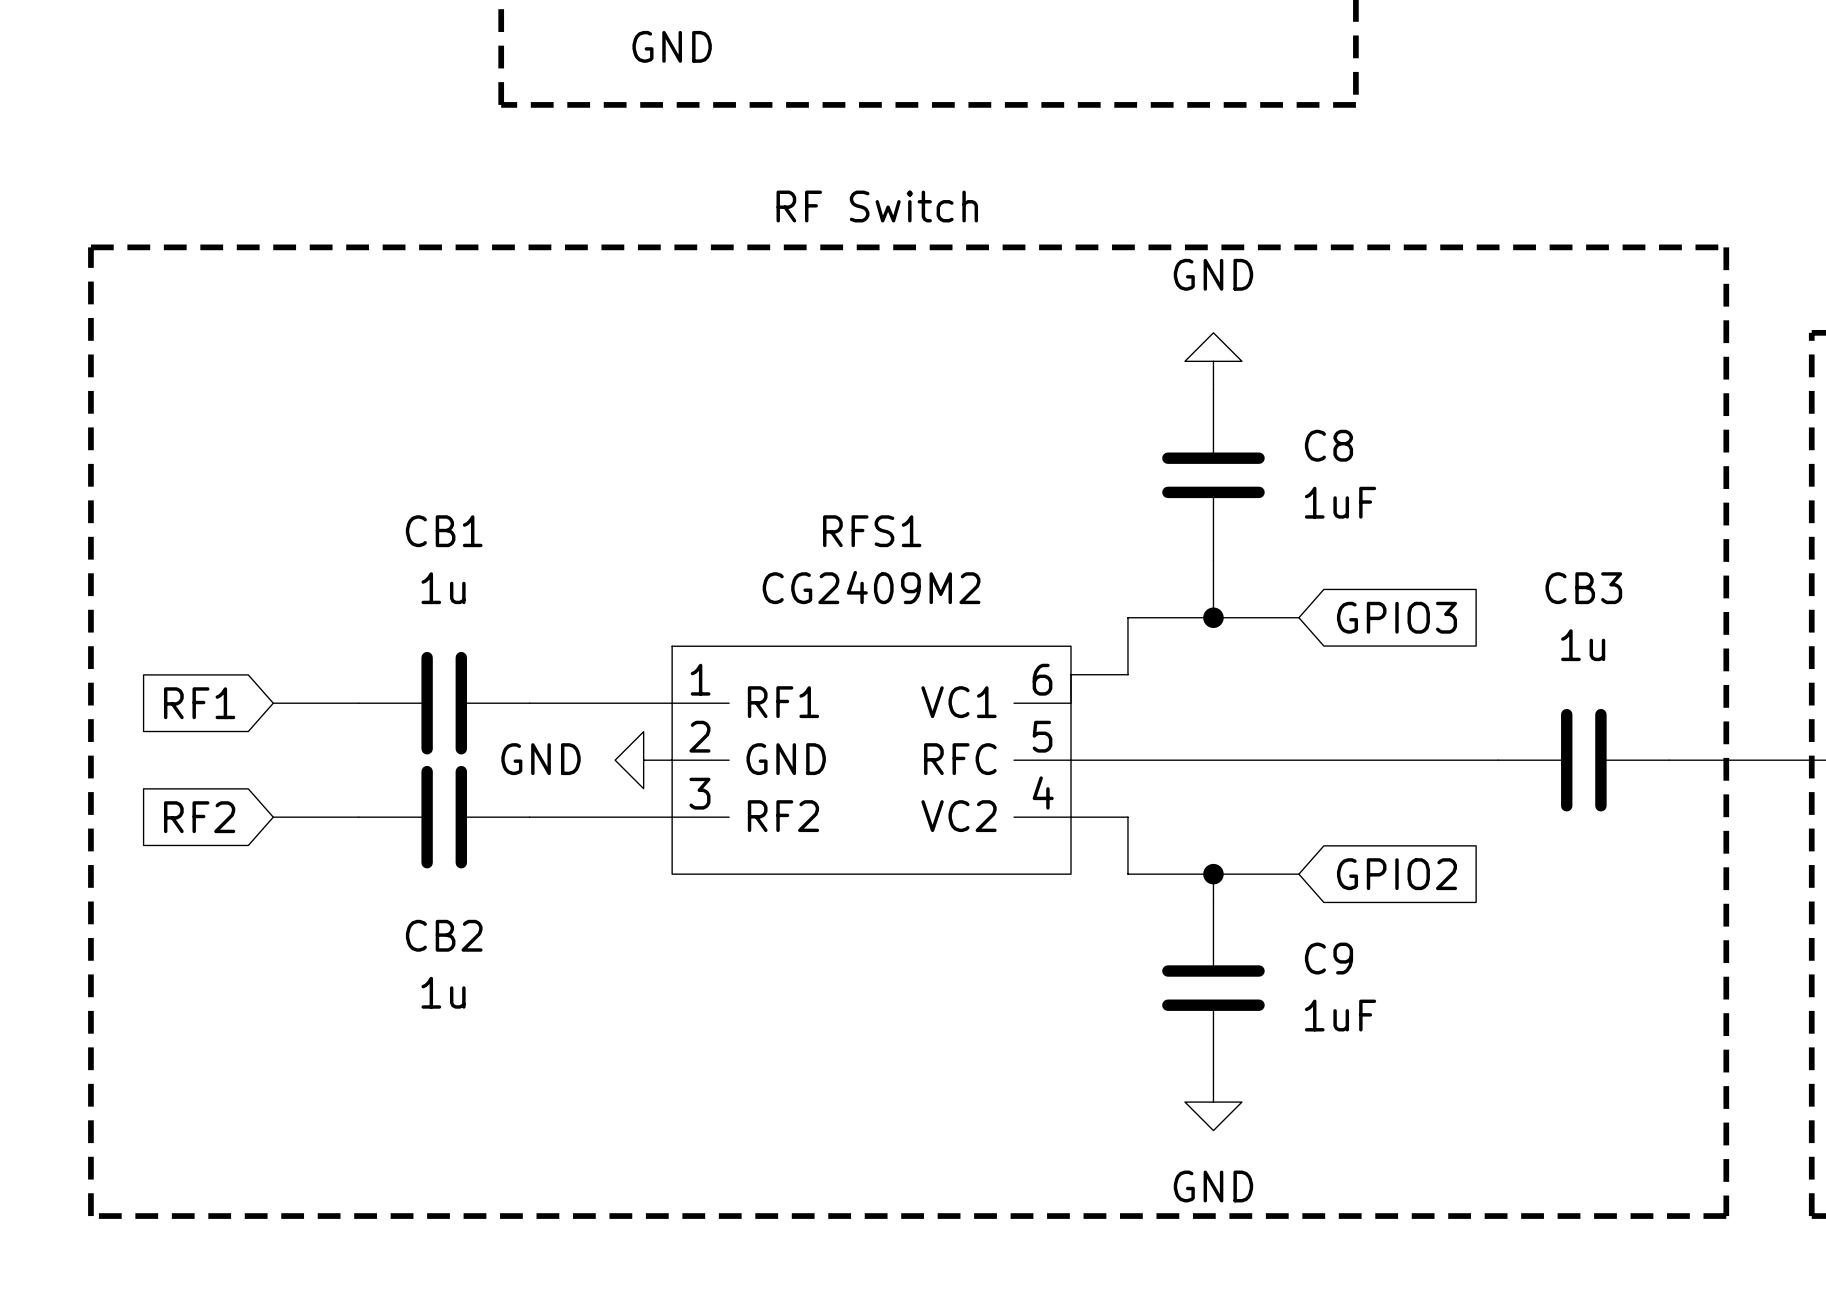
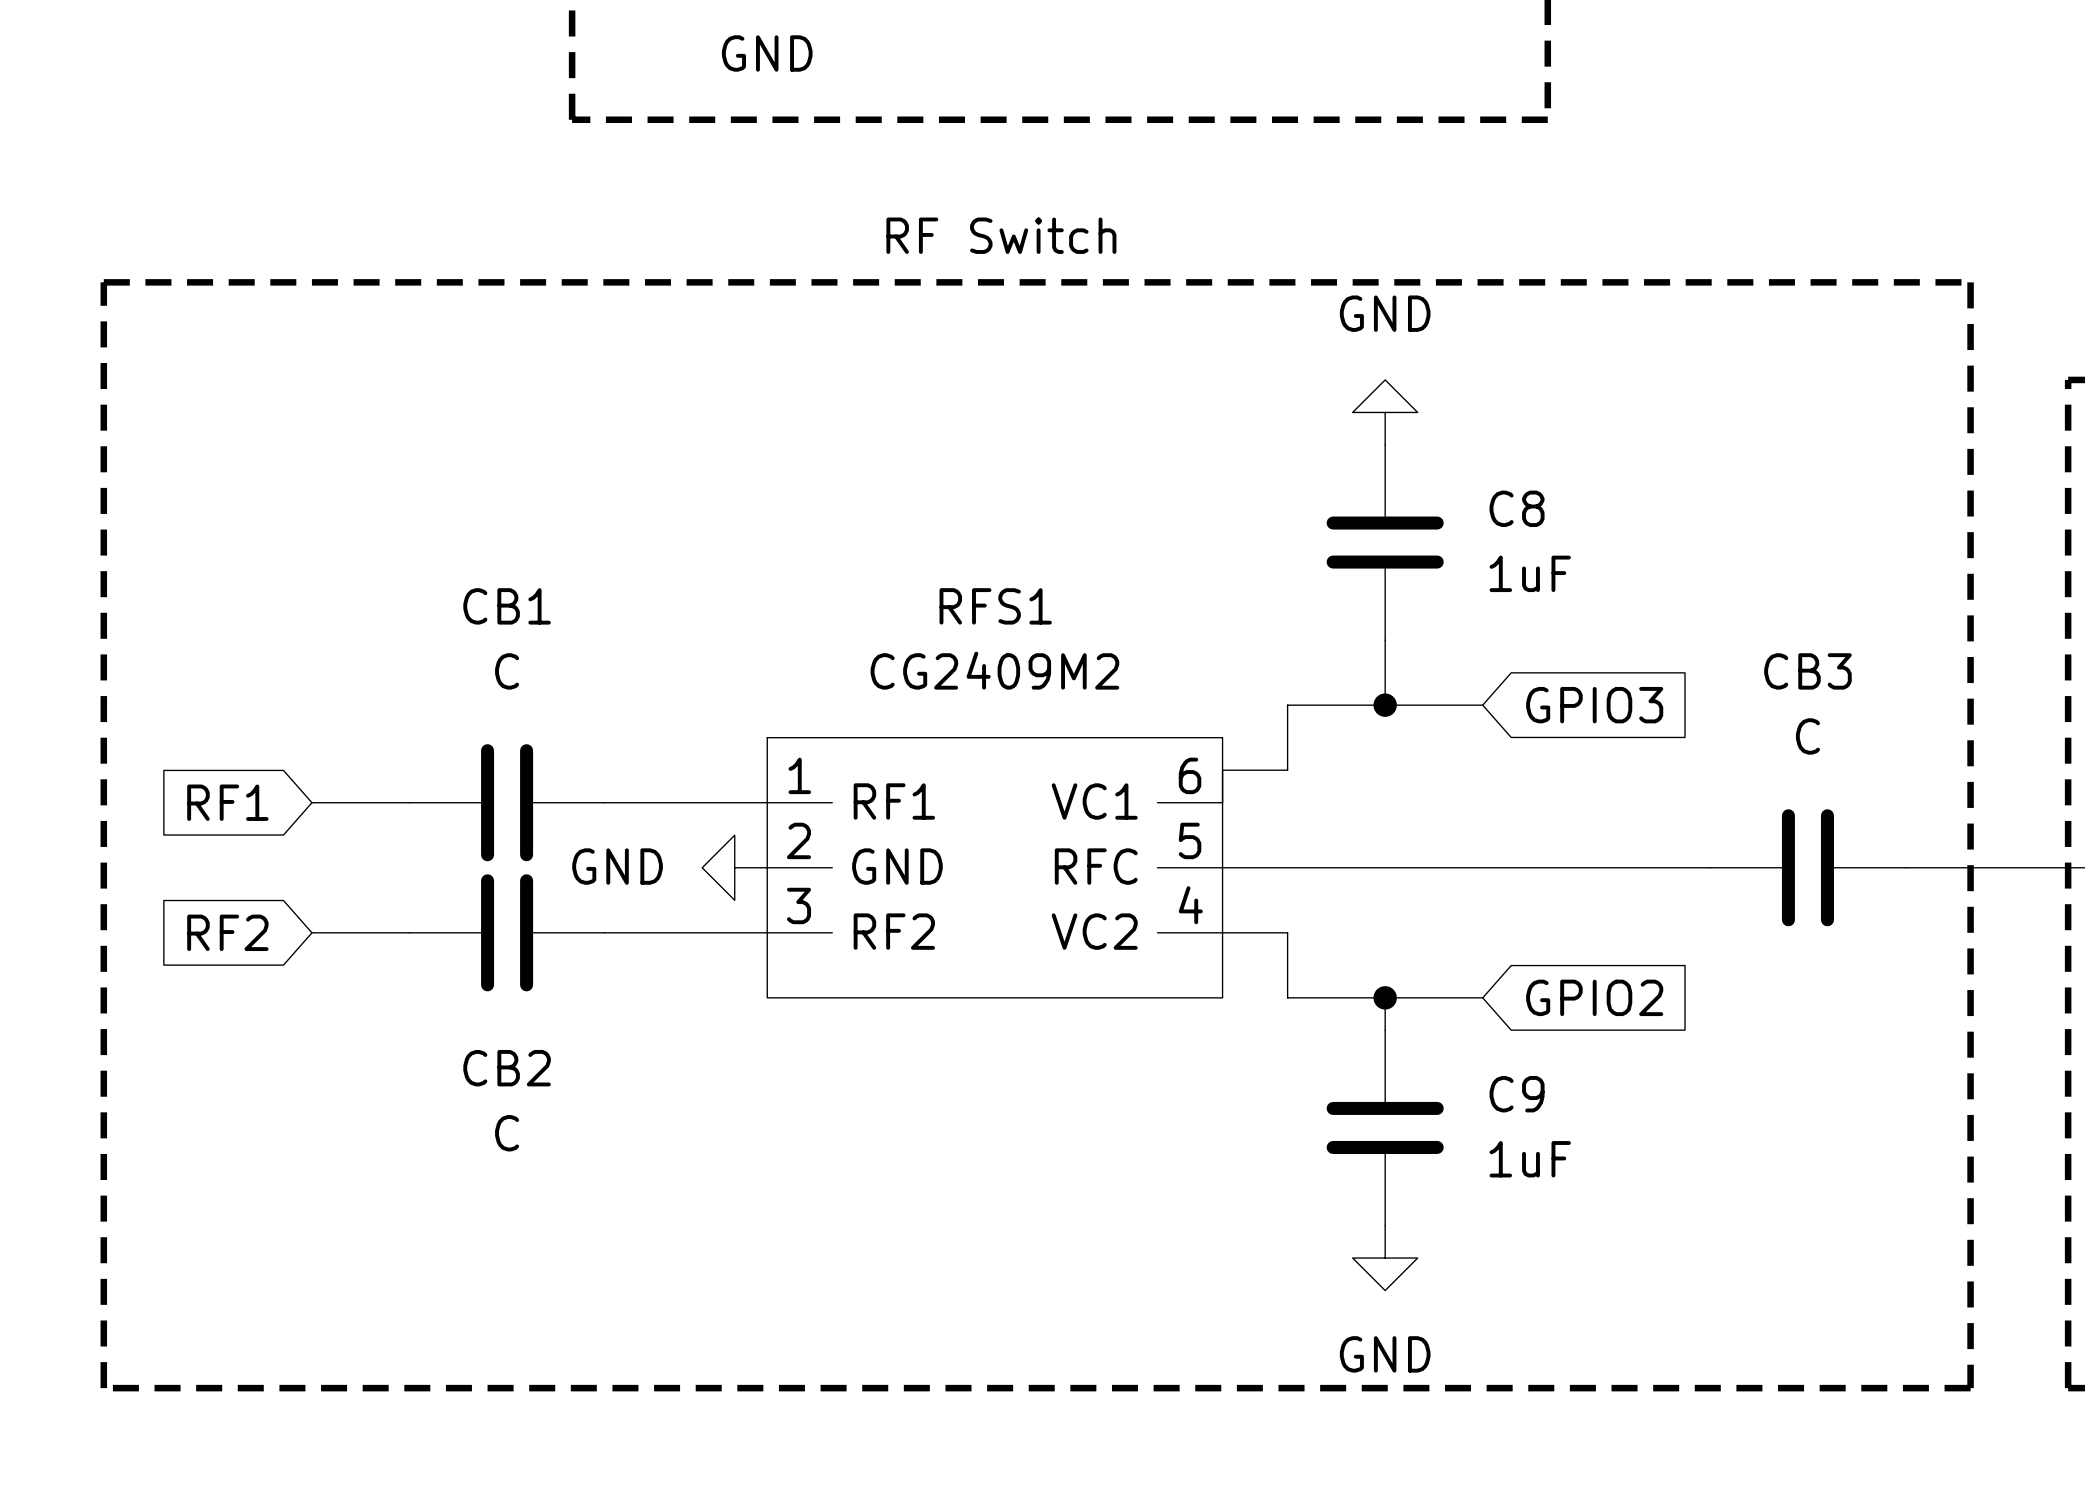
CB1 value: 1u (443, 588) -> C (507, 671)
CB3 value: 1u (1583, 645) -> C (1807, 736)
CB2 value: 1u (443, 992) -> C (507, 1133)

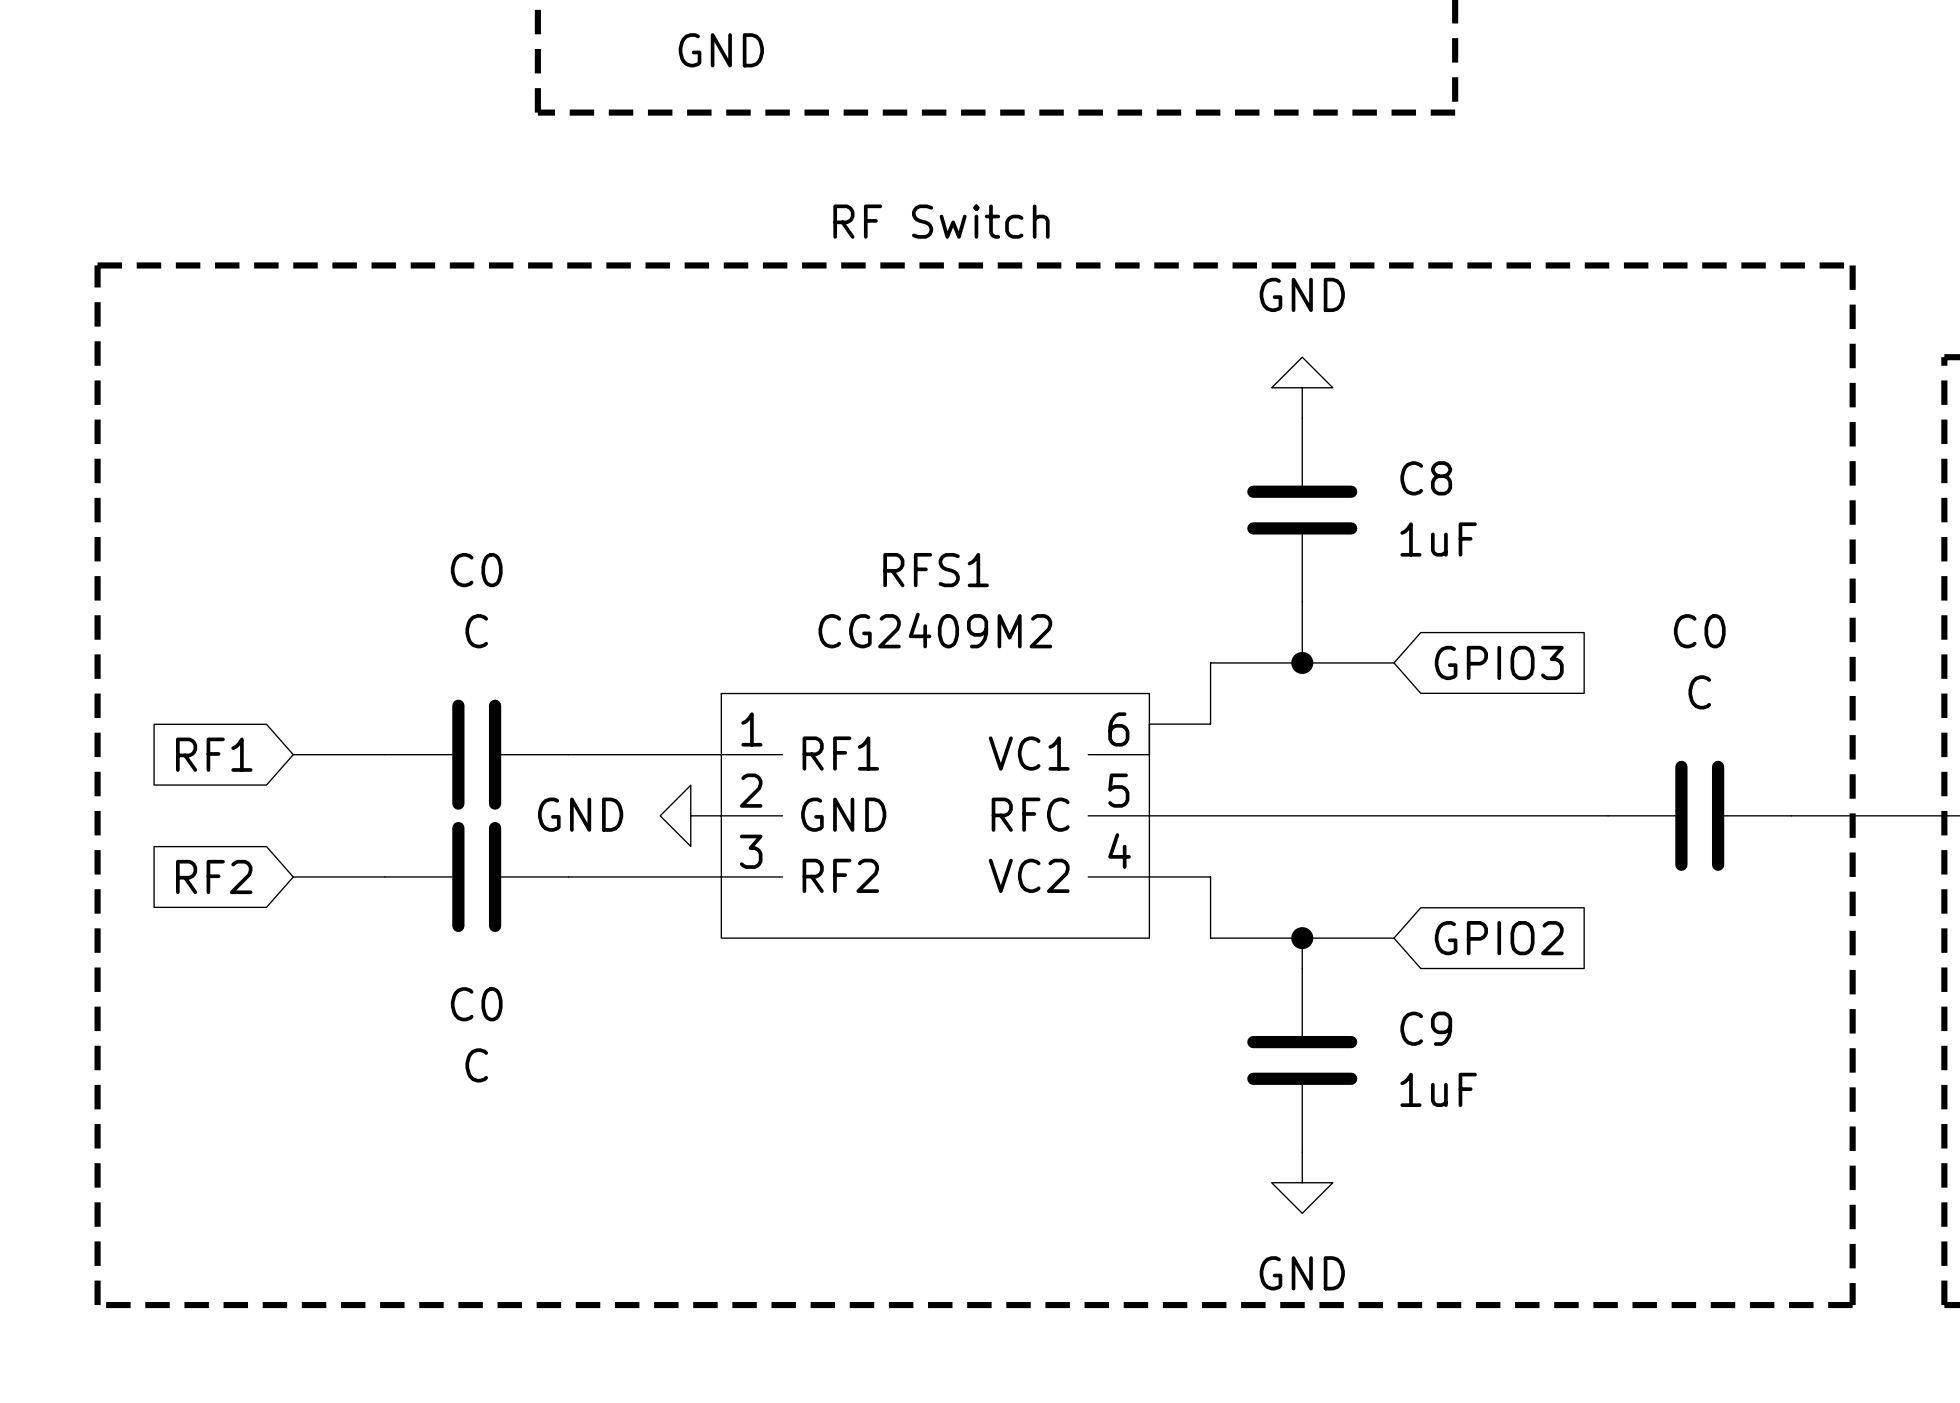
CB1 name: CB1 (507, 606) -> C0 (476, 570)
CB3 name: CB3 (1807, 671) -> C0 (1699, 631)
CB2 name: CB2 (507, 1068) -> C0 (476, 1004)

